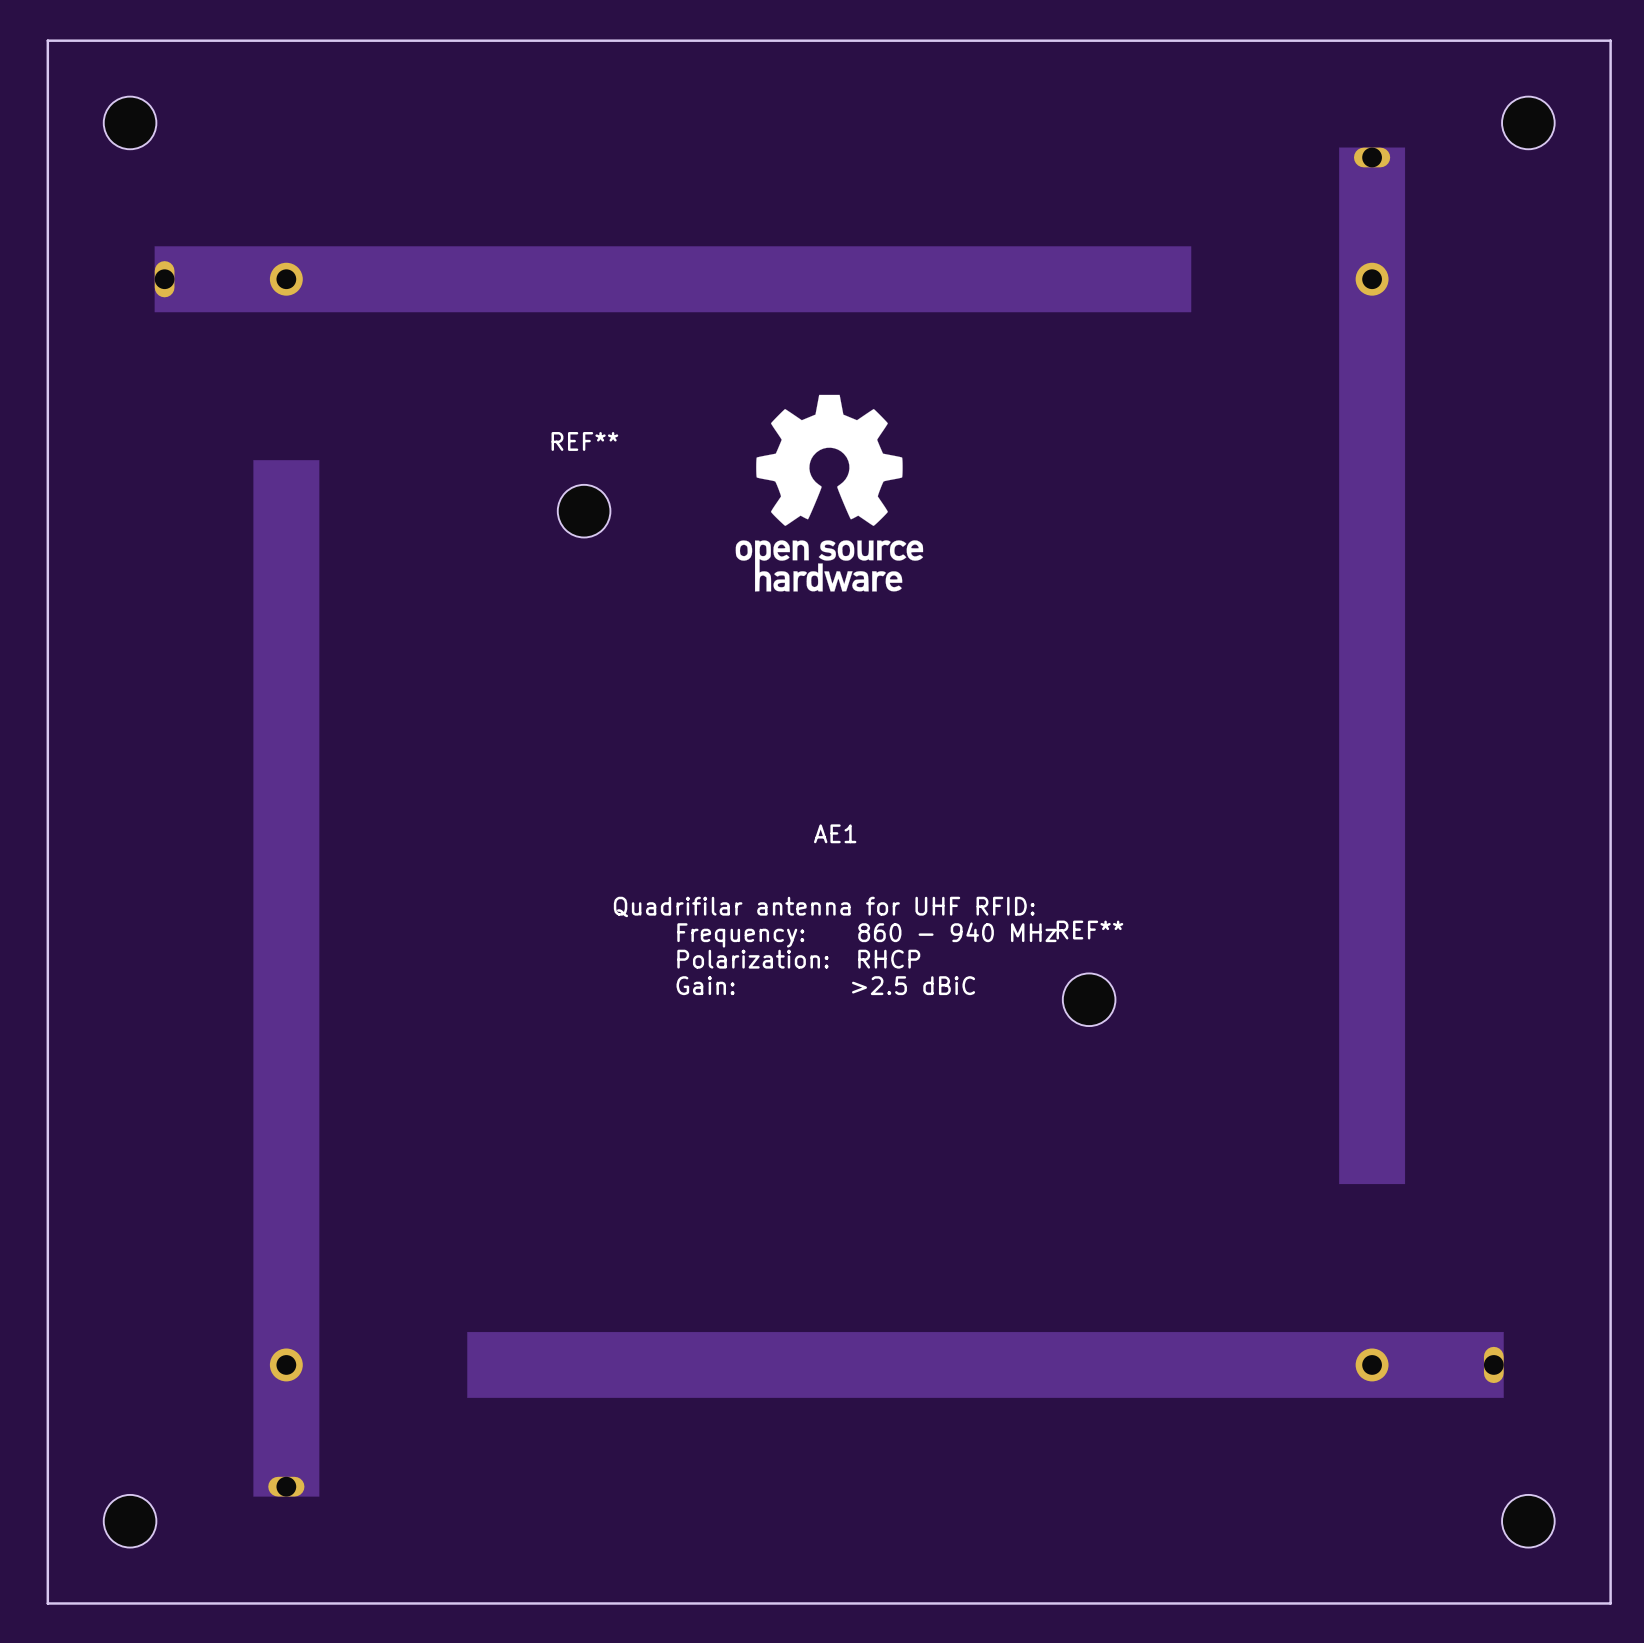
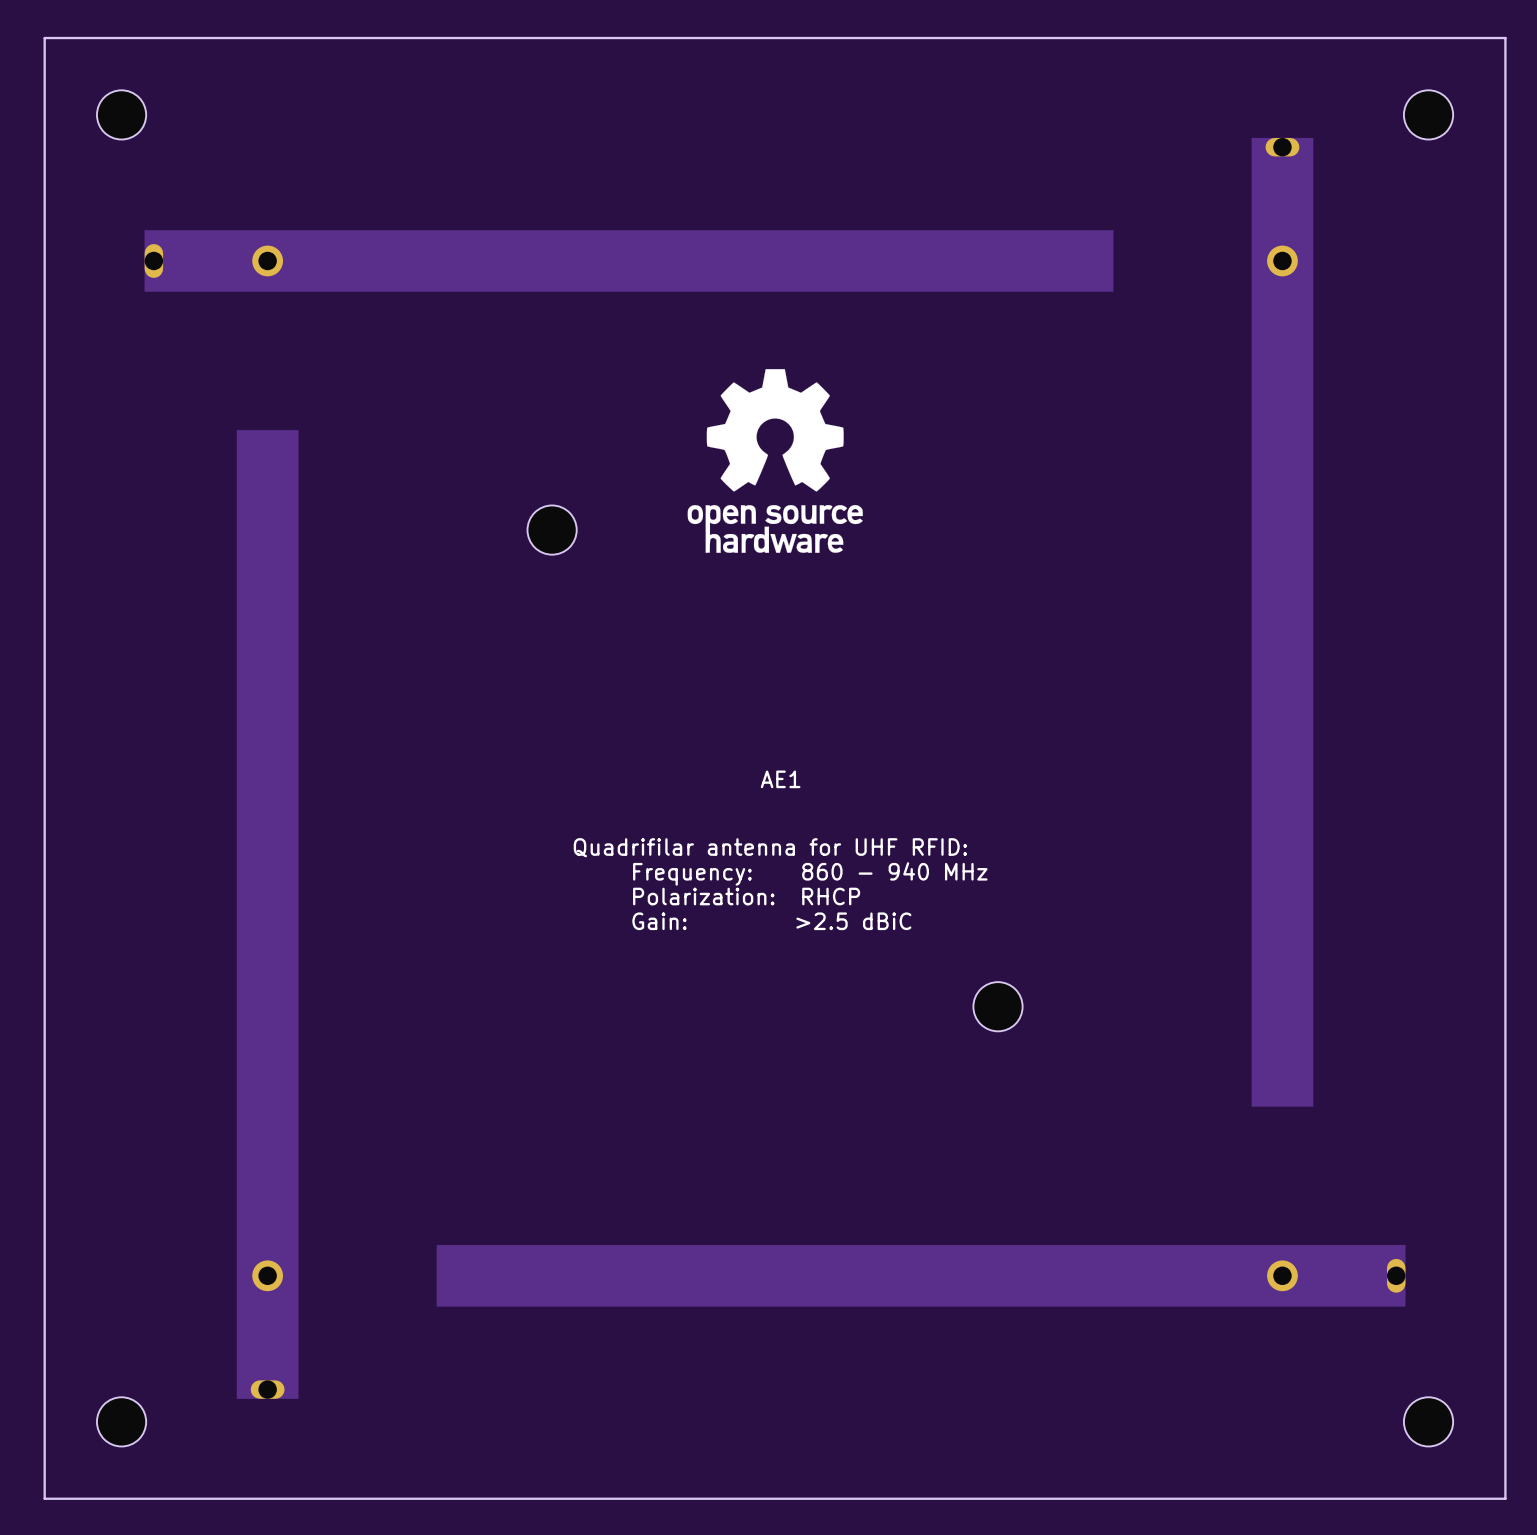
REF**: (584, 511) -> none
part: none -> (552, 530)
REF**: (1089, 999) -> none
part: none -> (998, 1006)

